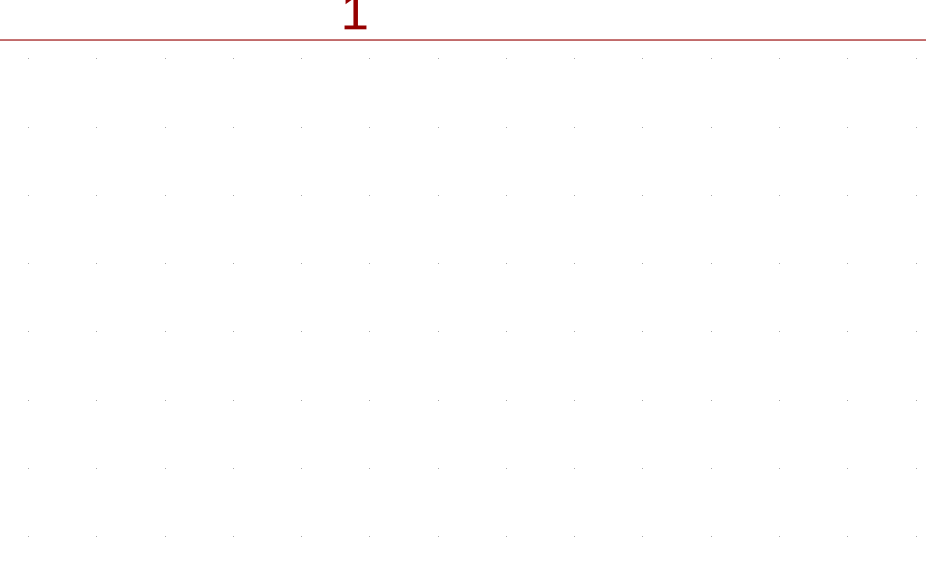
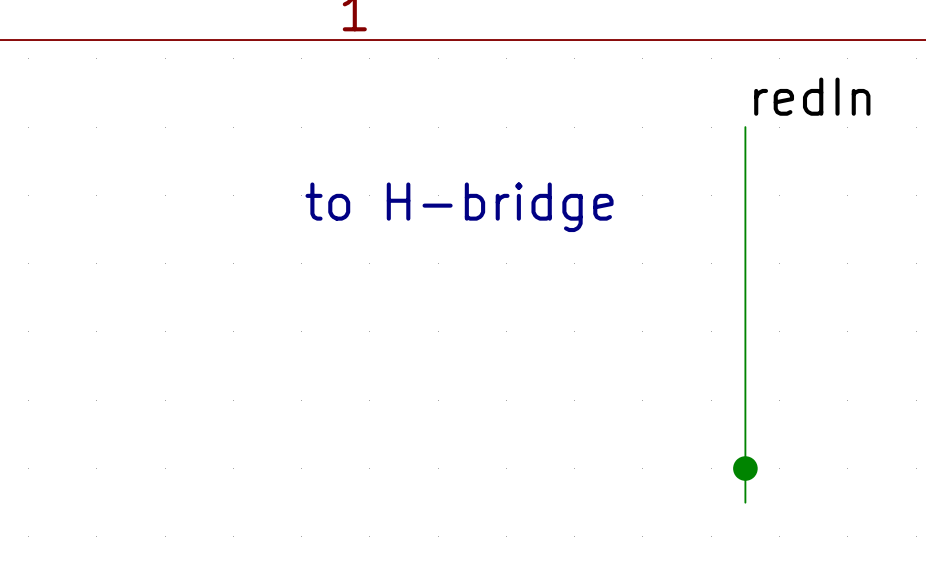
label: none -> redIn (812, 96)
wire: none -> (745, 127) (745, 502)
text: none -> to H-bridge (459, 207)
junction: none -> (745, 468)

